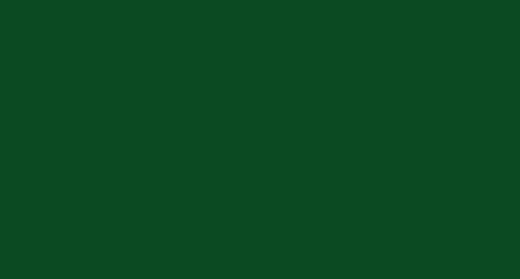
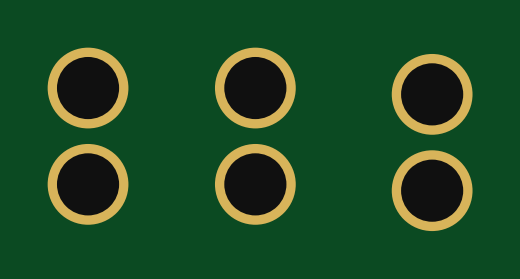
part: none -> (88, 136)
part: none -> (255, 136)
part: none -> (432, 142)

